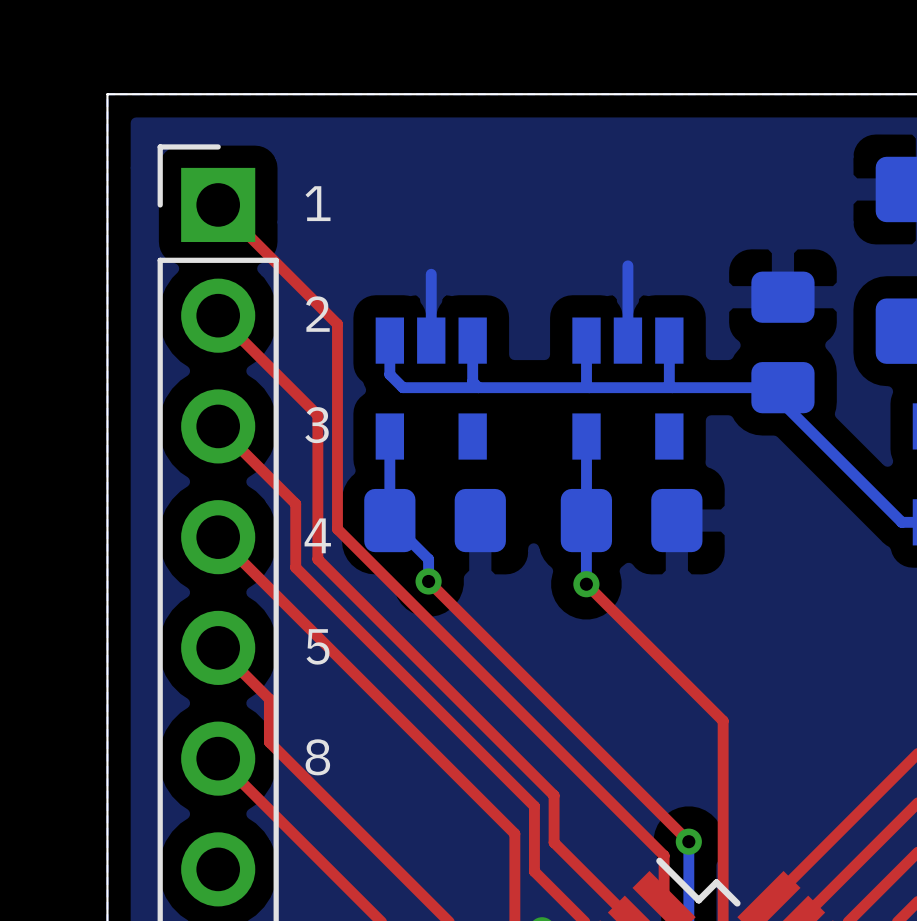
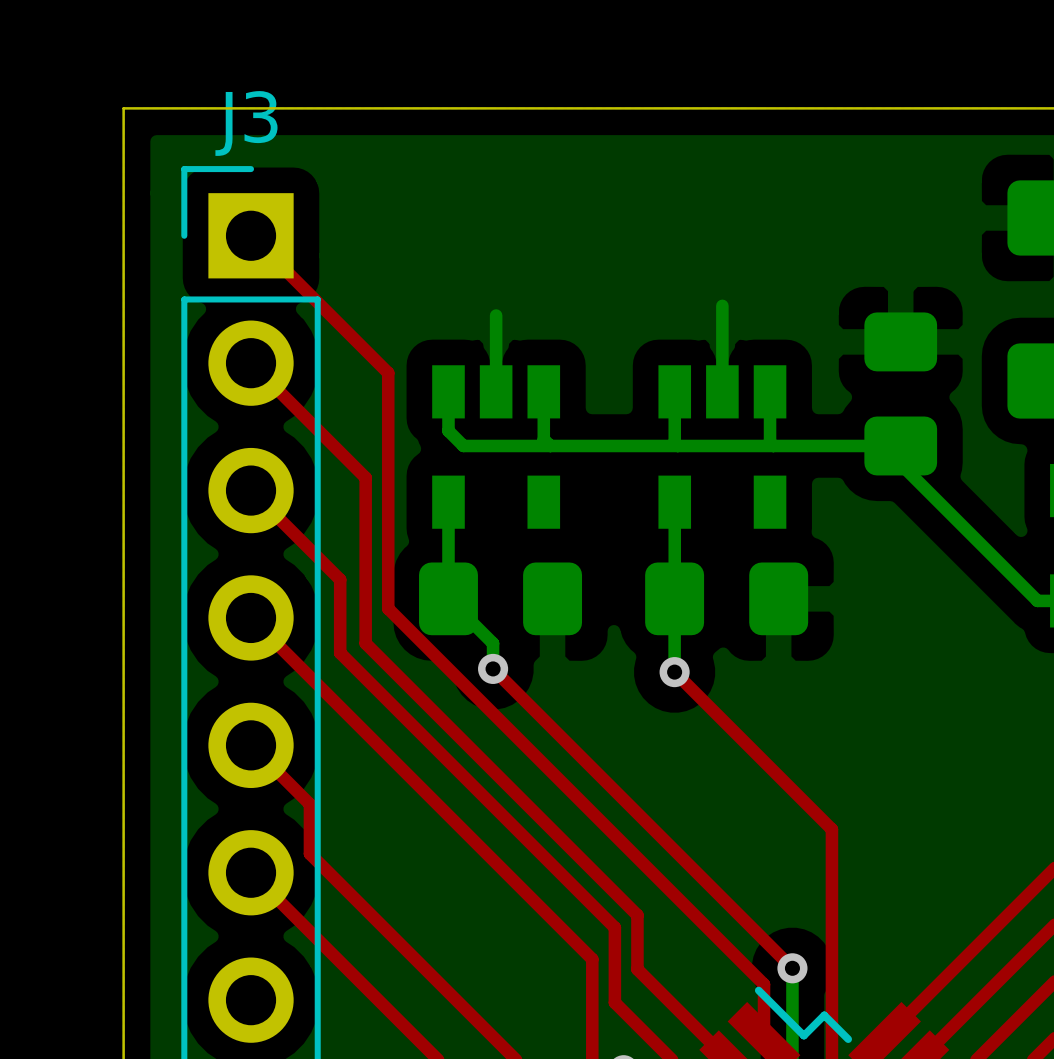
J3 name: none -> J3 (246, 123)
text: 1 (318, 203) -> none
text: 2 (317, 314) -> none
text: 3 (317, 425) -> none
text: 4 (317, 535) -> none
text: 5 (318, 646) -> none
text: 8 (317, 757) -> none

